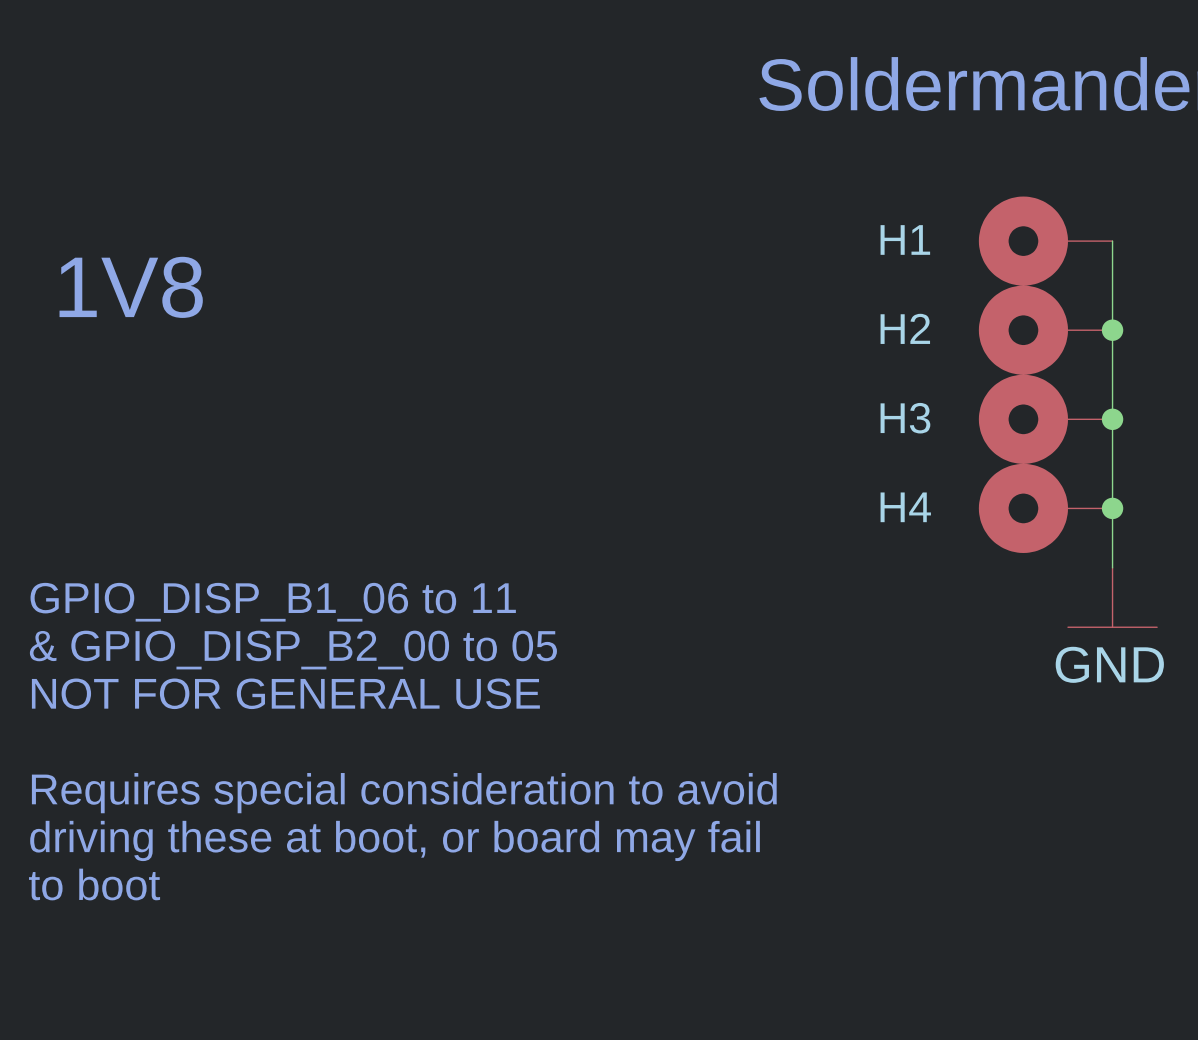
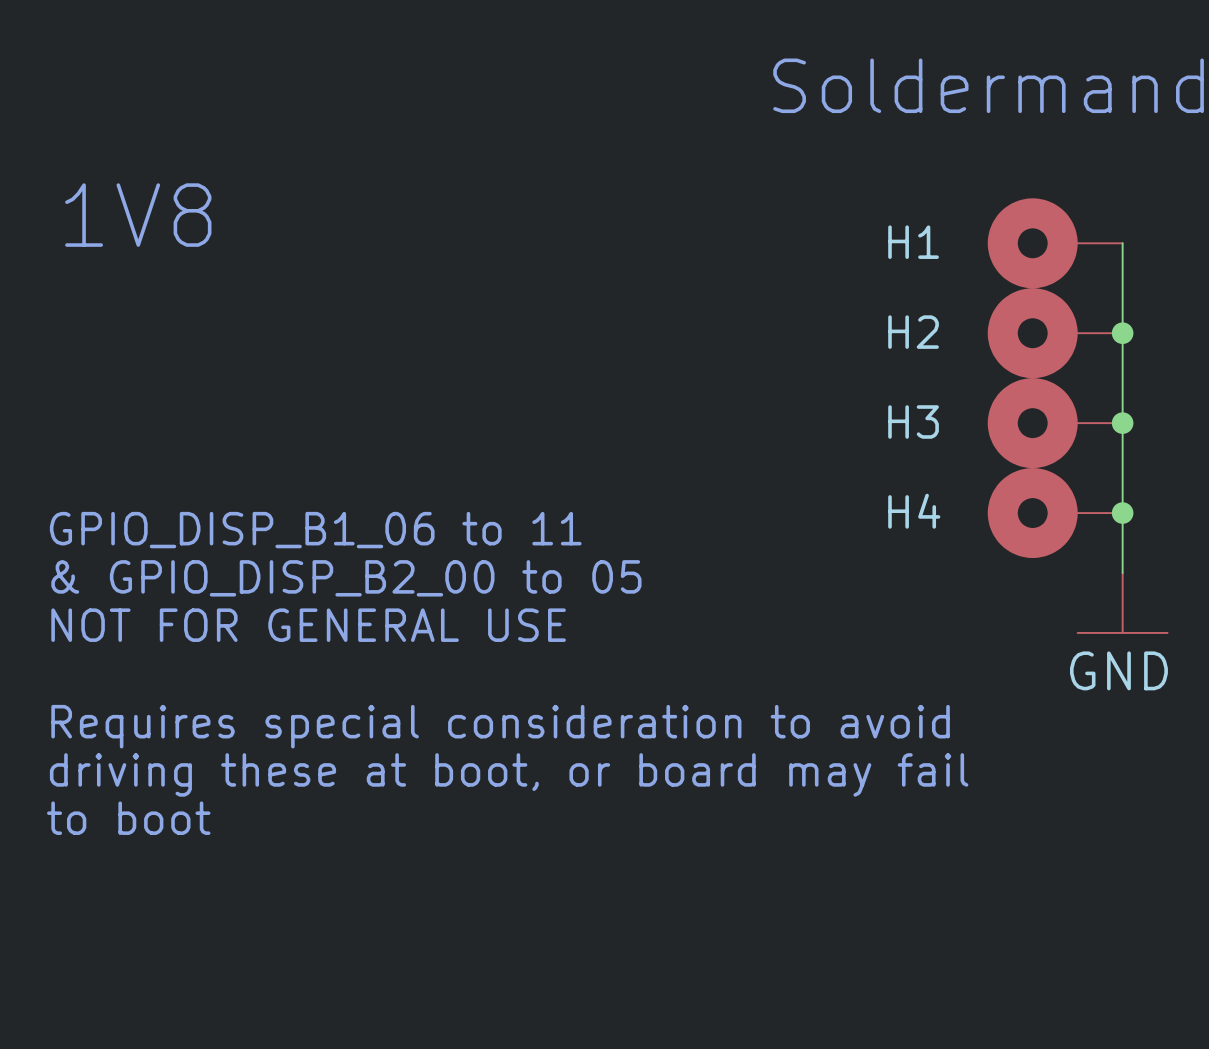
text position: 1V8 (131, 287) -> 1V8 (138, 215)
text position: GPIO_DISP_B1_06 to 11 (273, 602) -> GPIO_DISP_B1_06 to 11 (315, 530)
text position: & GPIO_DISP_B2_00 to 05 (293, 650) -> & GPIO_DISP_B2_00 to 05 (346, 578)
text position: NOT FOR GENERAL USE (285, 693) -> NOT FOR GENERAL USE (308, 625)
text position: Requires special consideration to avoid (404, 793) -> Requires special consideration to avoid (500, 726)
text position: driving these at boot, or board may fail (395, 840) -> driving these at boot, or board may fail (509, 774)
text position: to boot (94, 884) -> to boot (128, 818)

